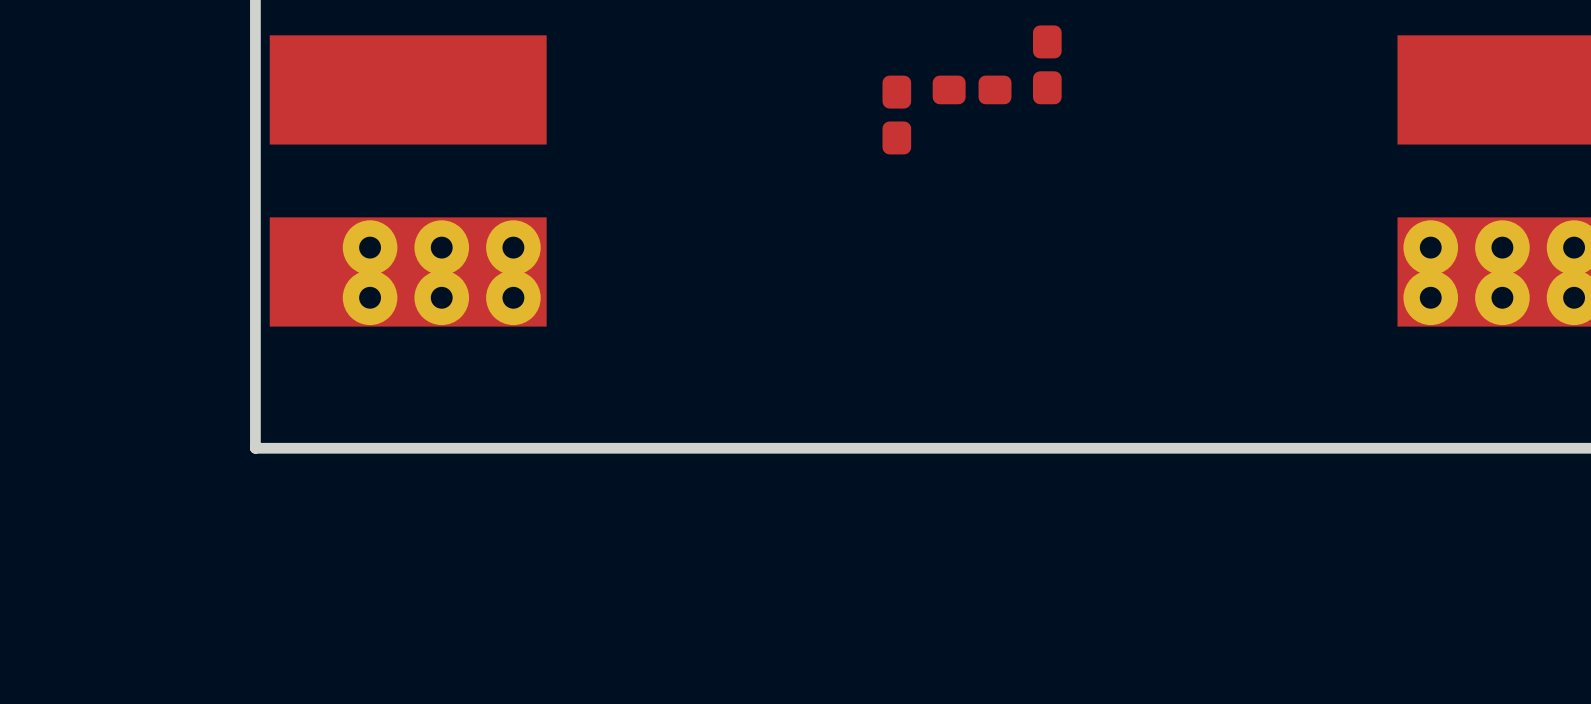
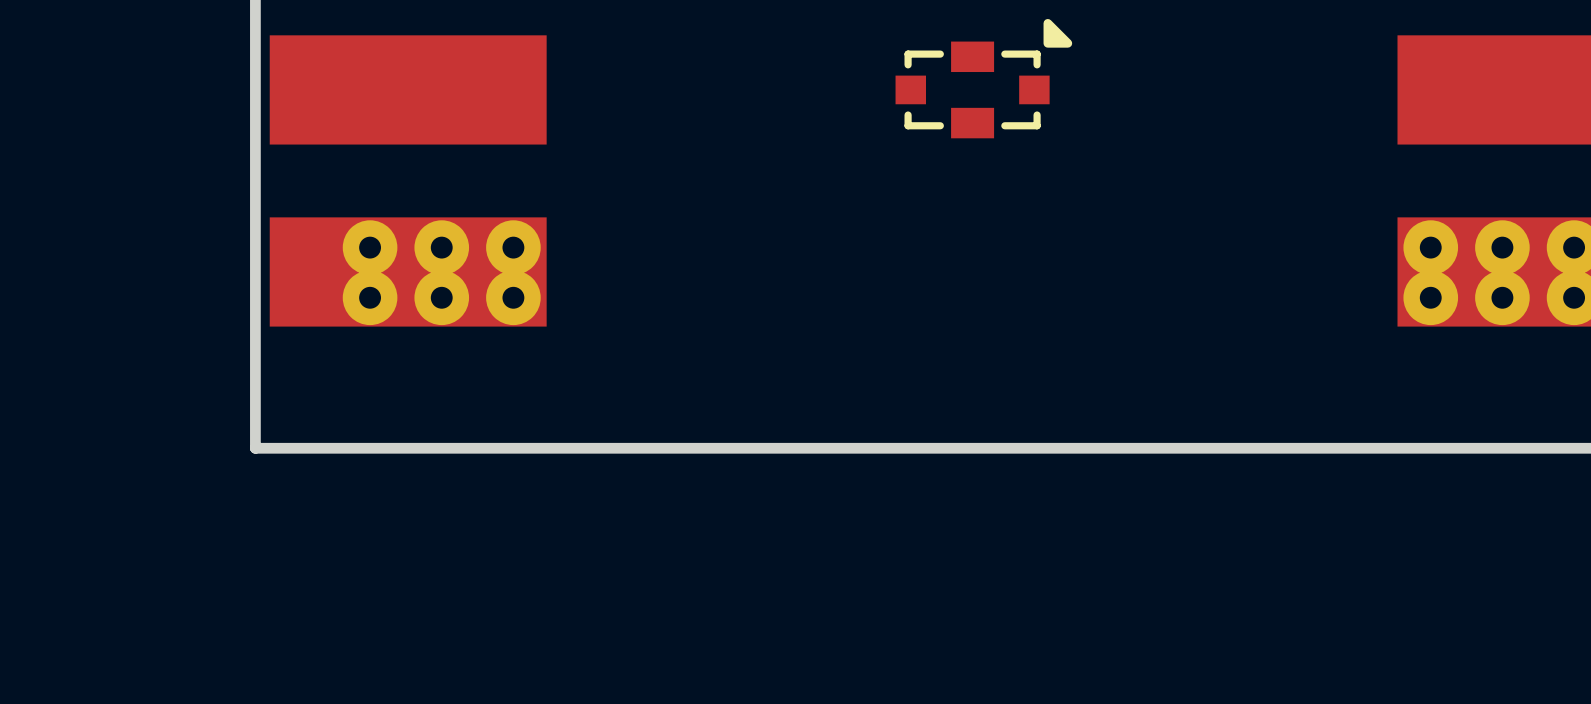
part: (1047, 64) -> none
part footprint: [932, 75, 1012, 105] -> [895, 18, 1073, 139]
part: (896, 115) -> none

